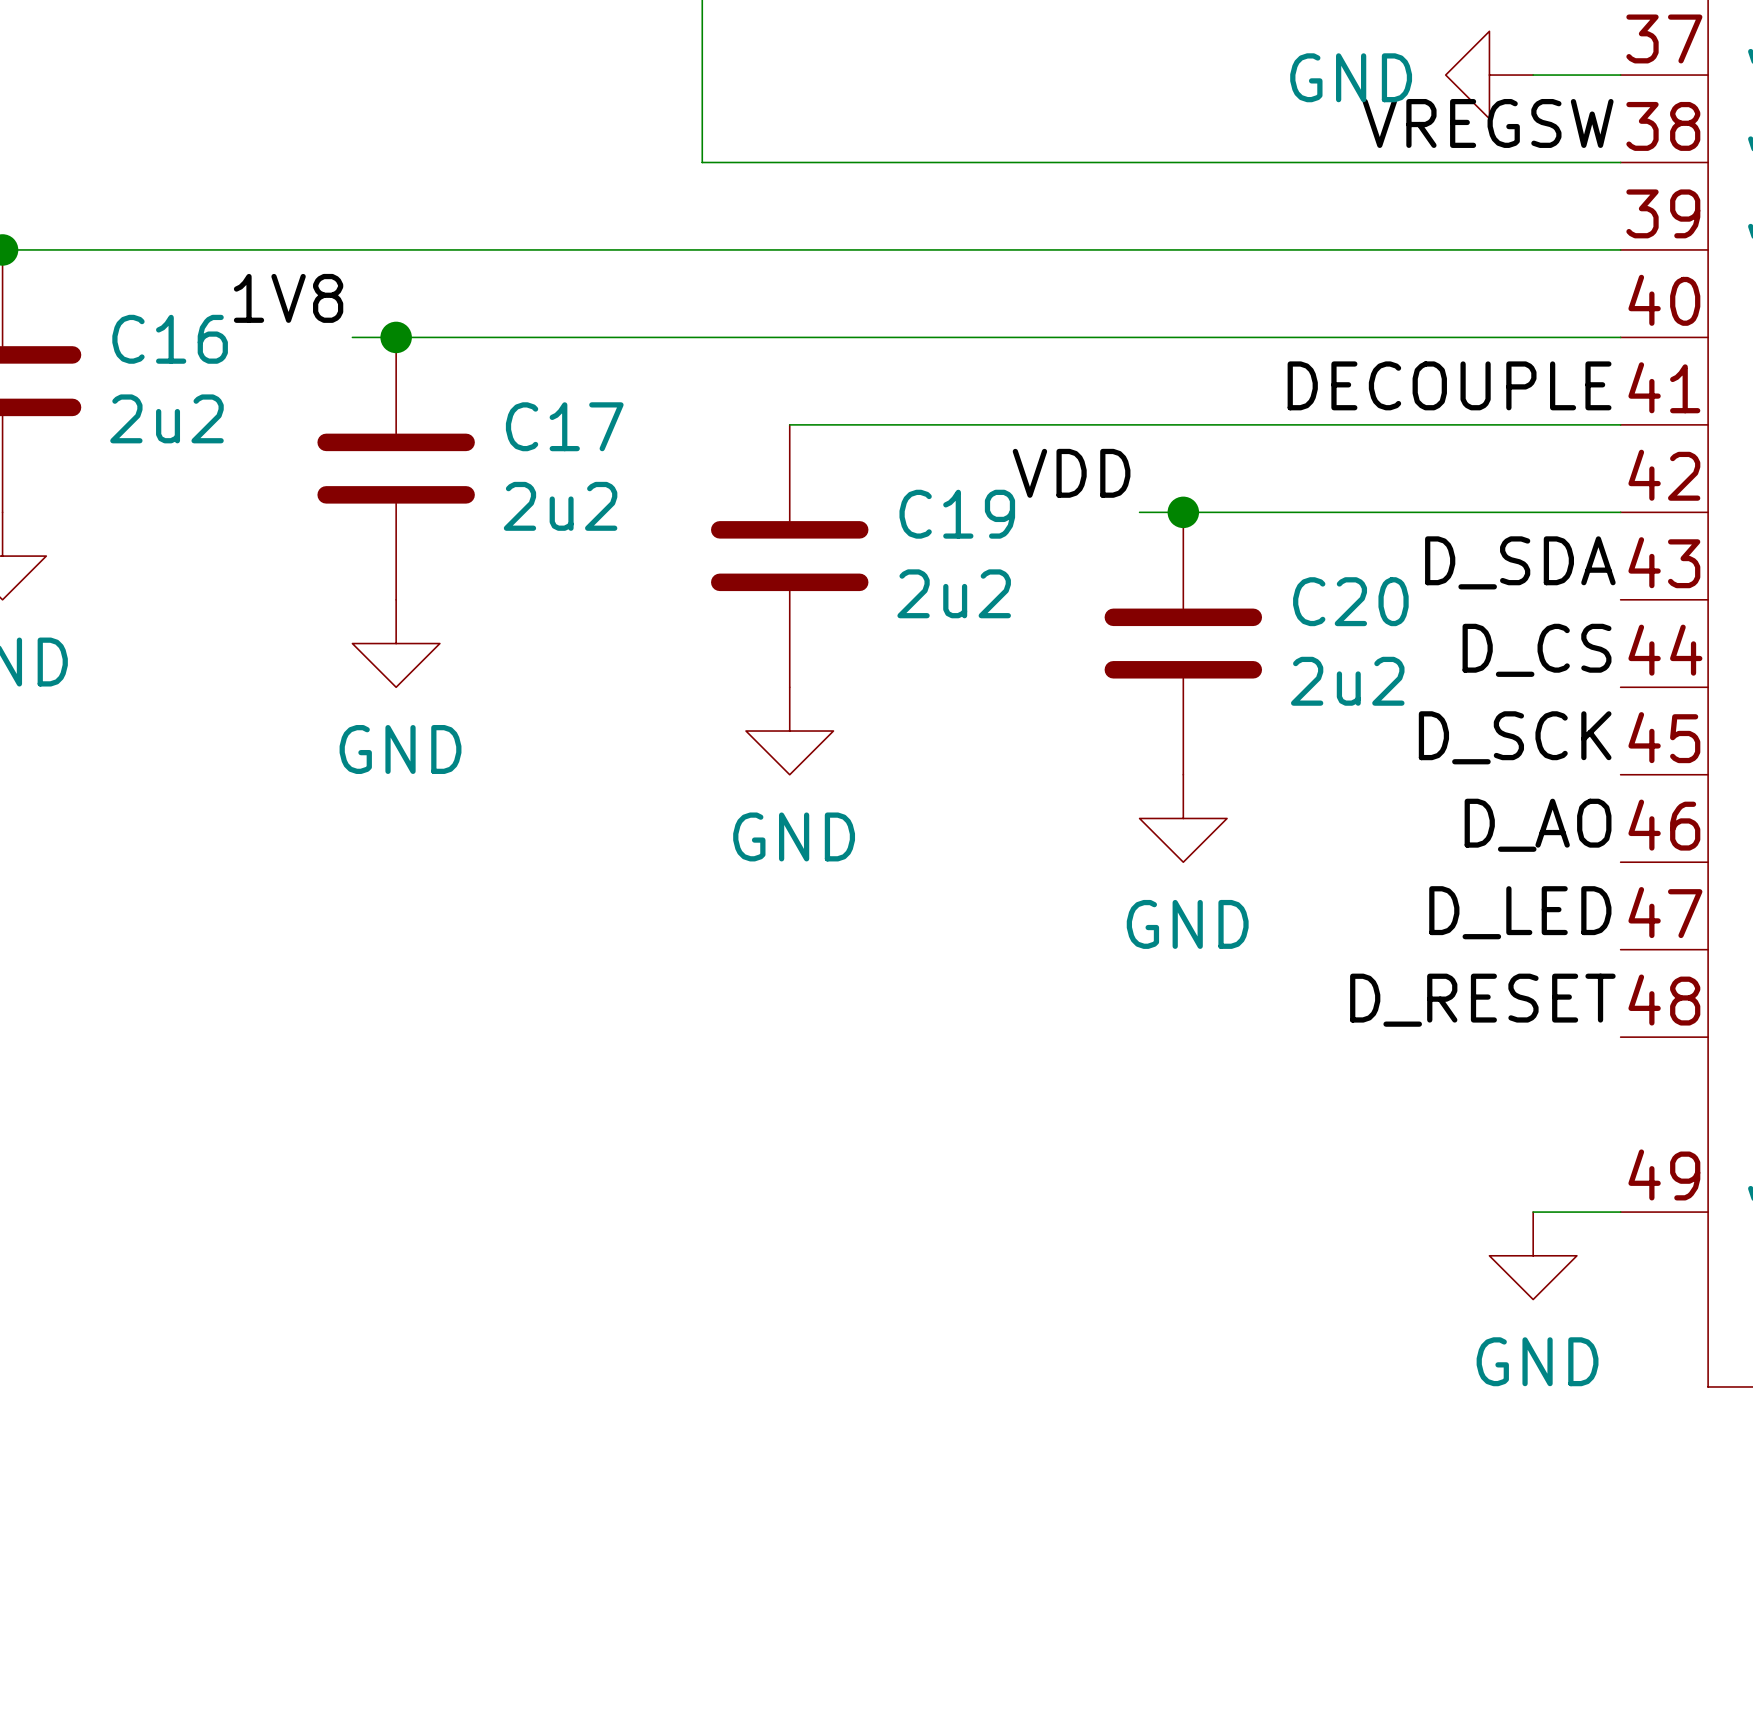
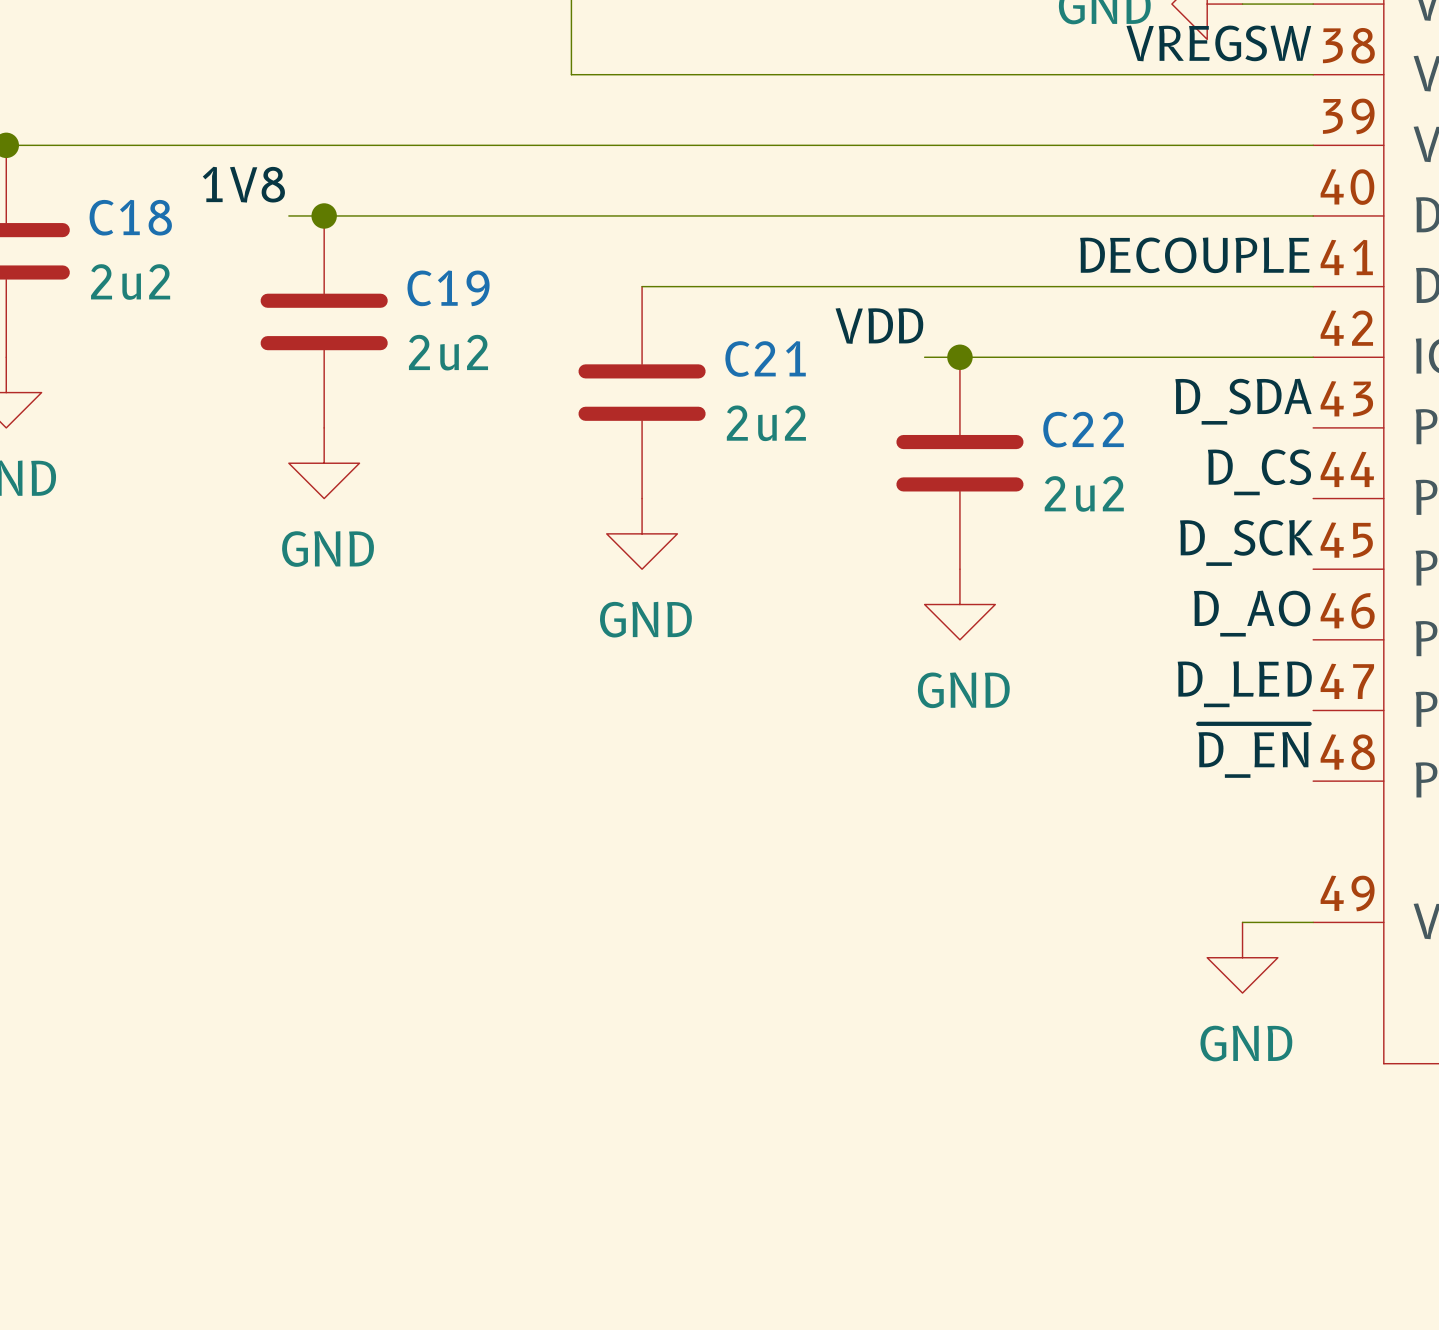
C16 name: C16 (170, 339) -> C18 (130, 217)
C17 name: C17 (564, 426) -> C19 (448, 288)
C19 name: C19 (957, 514) -> C21 (765, 358)
C20 name: C20 (1350, 601) -> C22 (1083, 429)
label: D_RESET (1482, 1000) -> ~{D_EN} (1253, 750)

